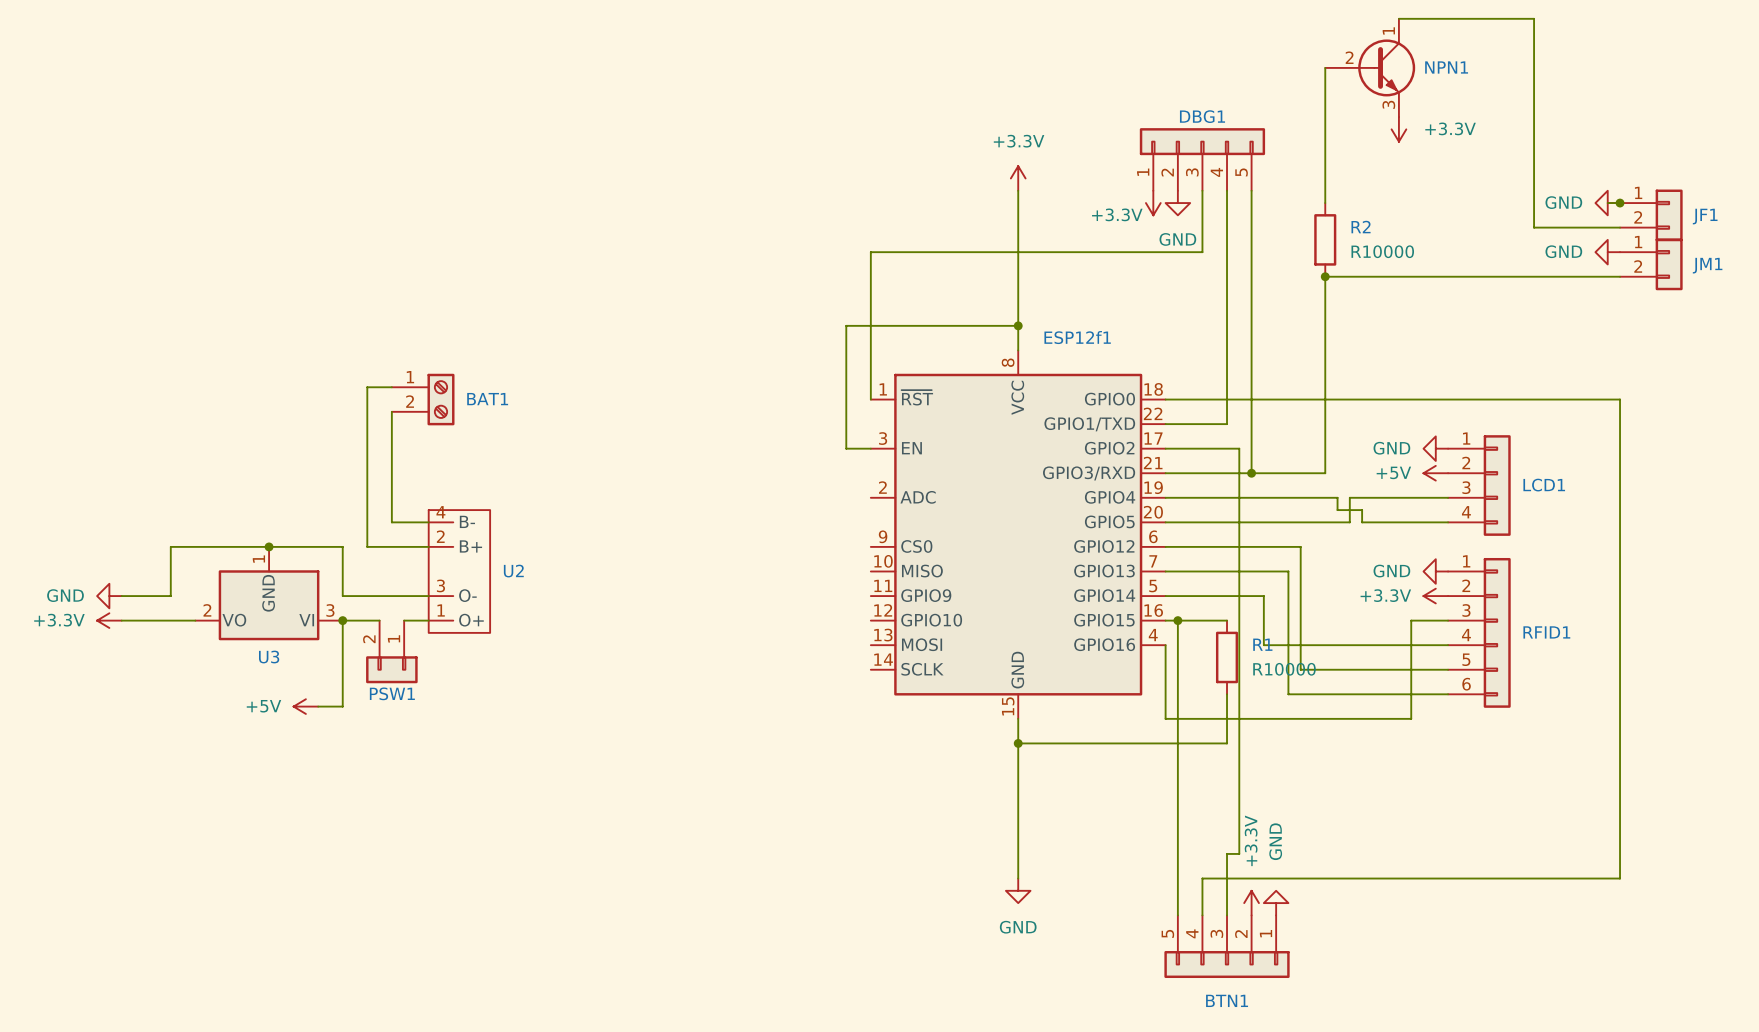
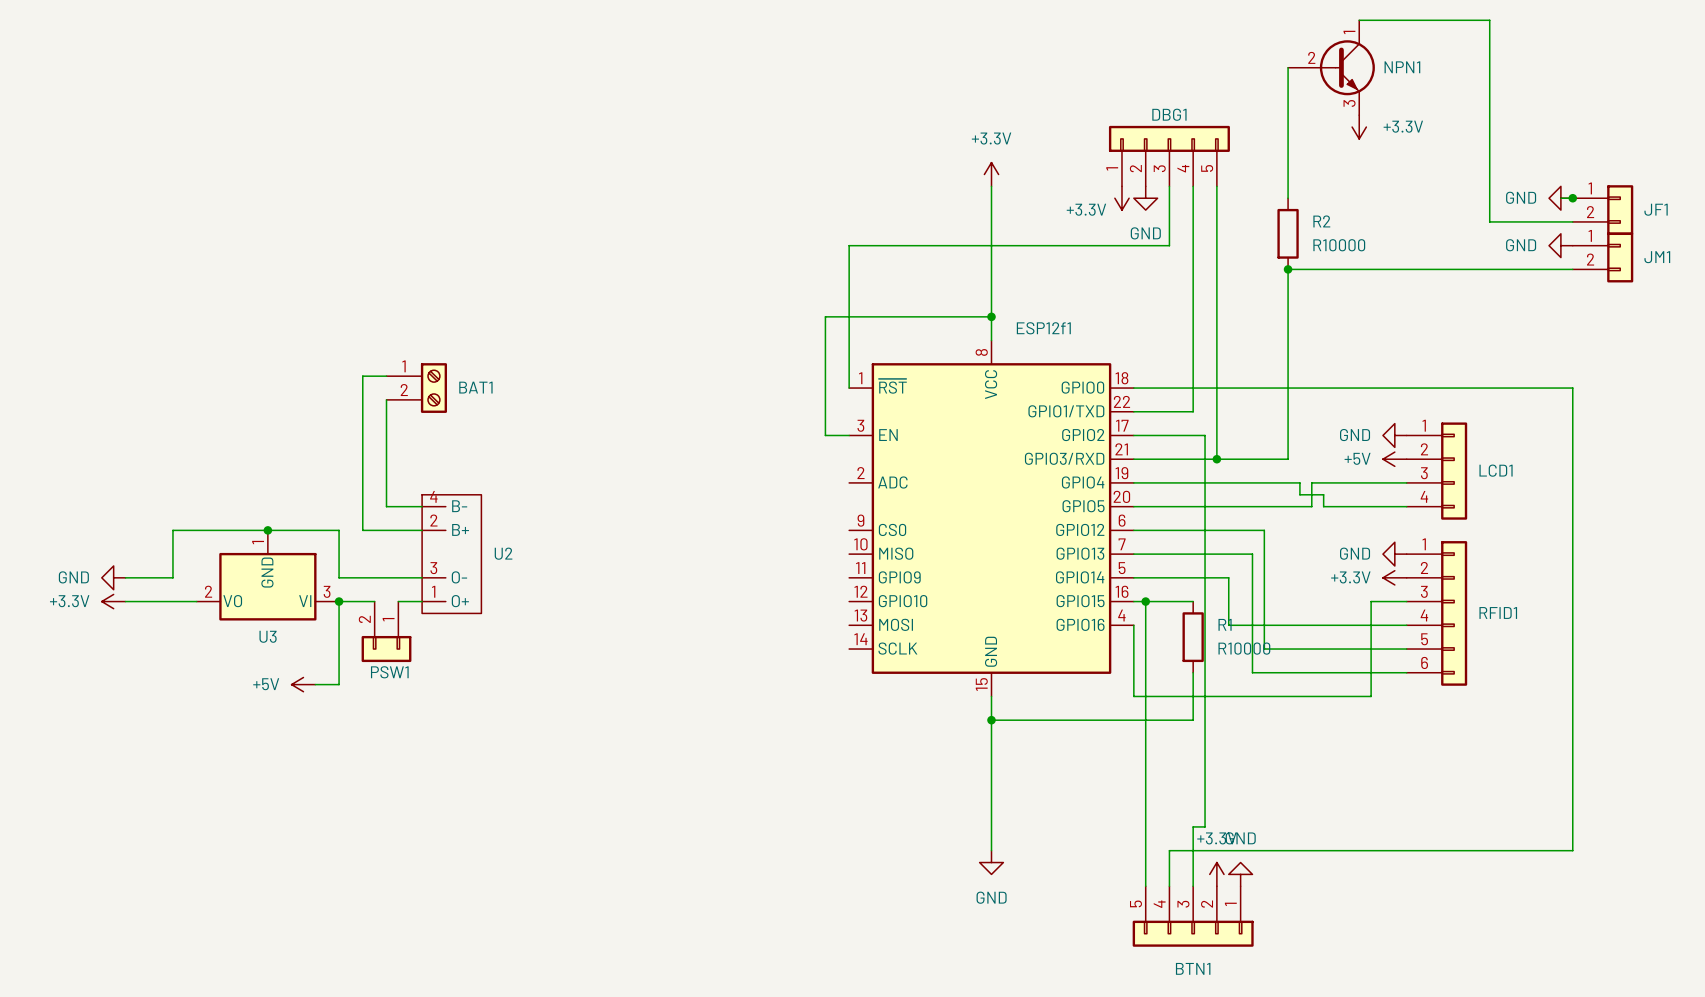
power symbol text rotation: 0° (1251, 840) -> 90° clockwise (1216, 838)
power symbol text rotation: 0° (1275, 841) -> 90° clockwise (1240, 838)

